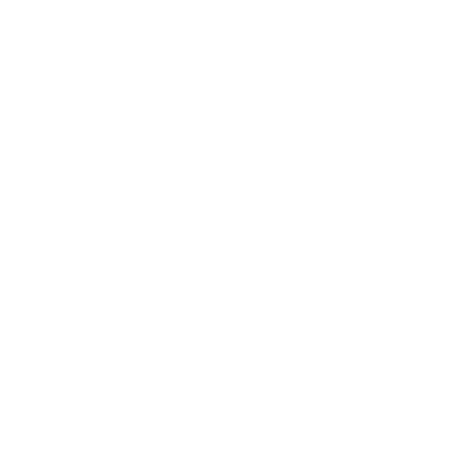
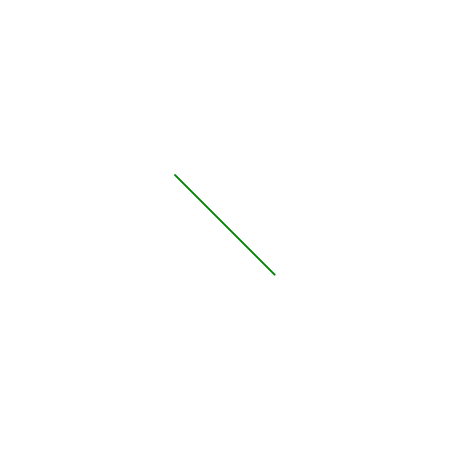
wire: none -> (174, 174) (274, 274)

